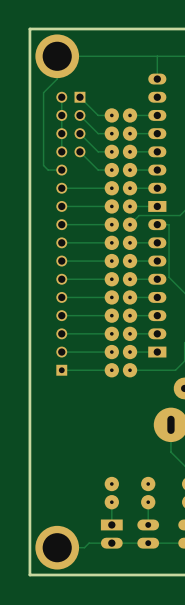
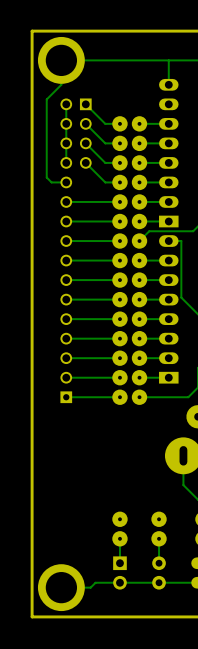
part footprint: [100, 519, 123, 549] -> [113, 556, 127, 590]
part footprint: [137, 519, 160, 549] -> [152, 556, 166, 590]

